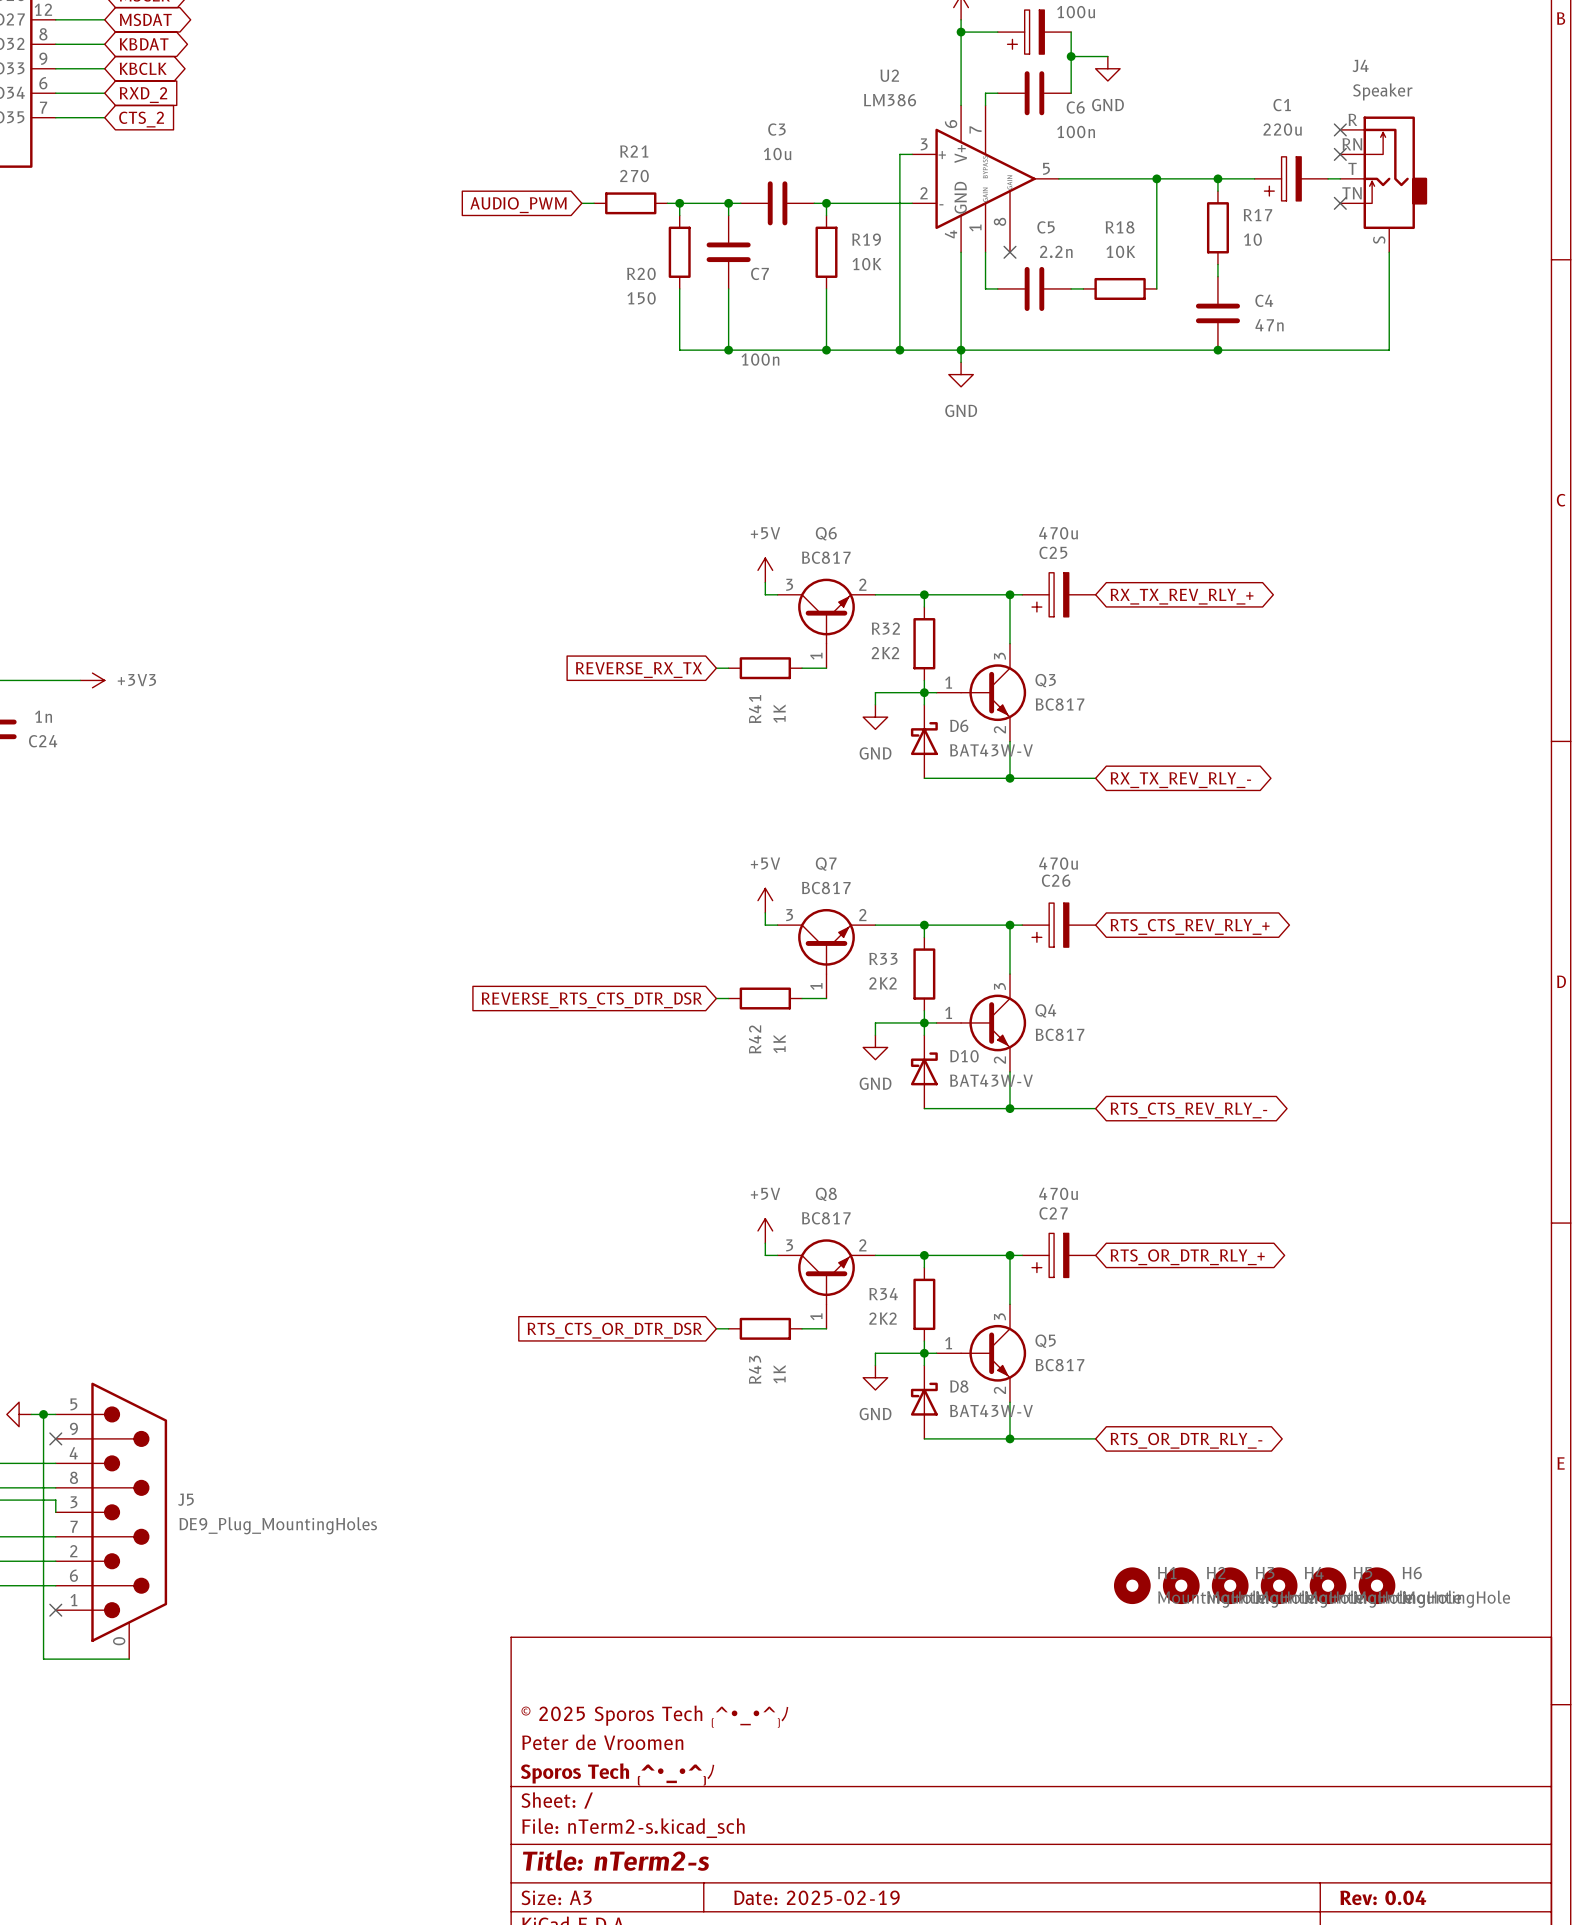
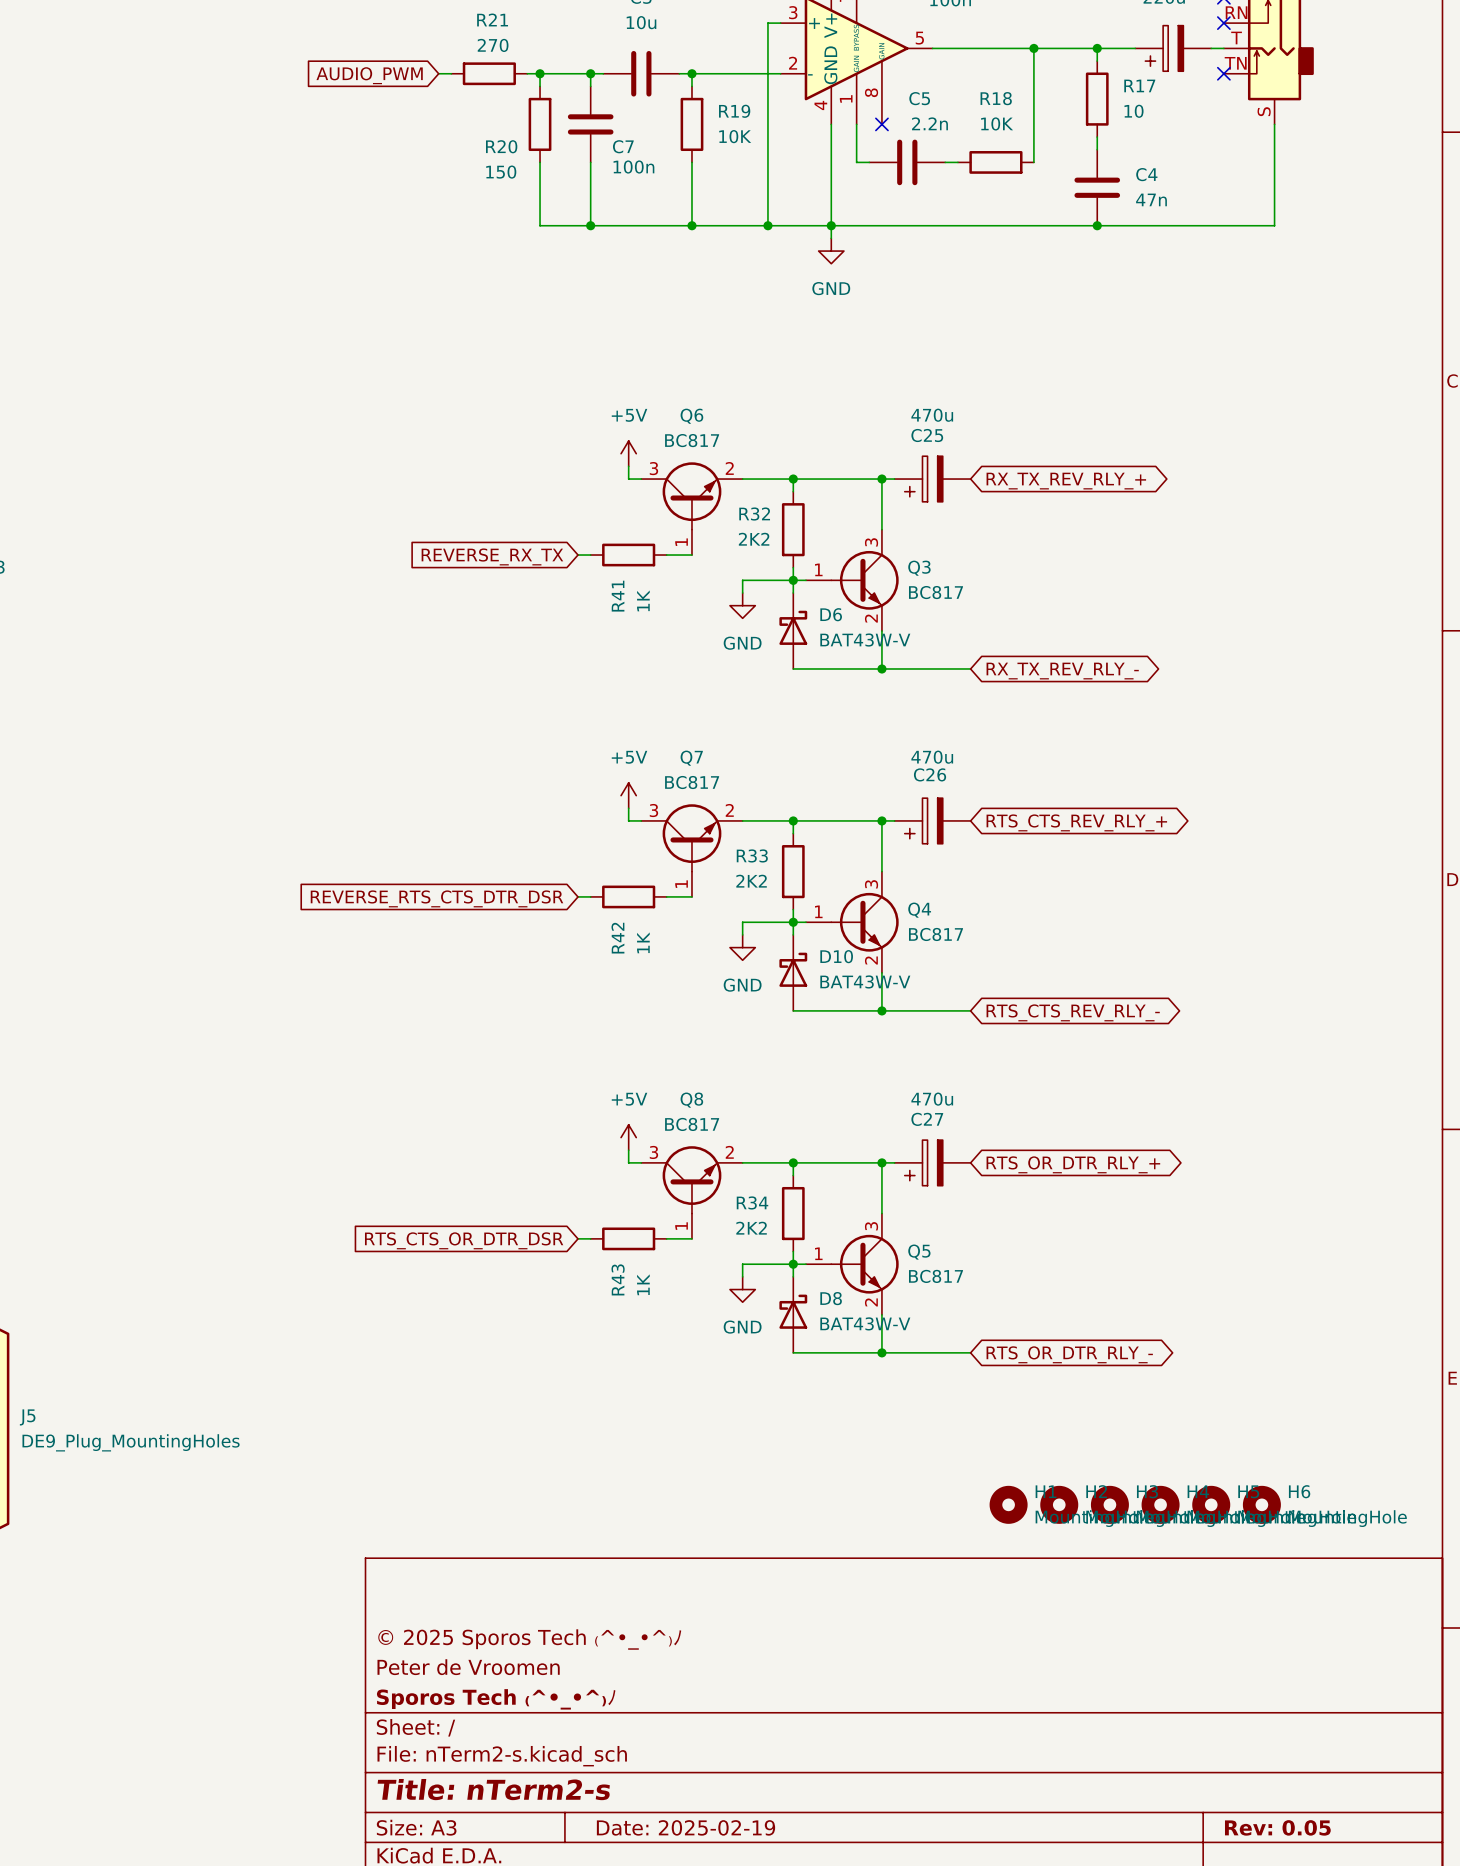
C7 value position: 100n (760, 359) -> 100n (633, 167)
title block: Rev: 0.04 (1383, 1897) -> Rev: 0.05 (1277, 1827)

